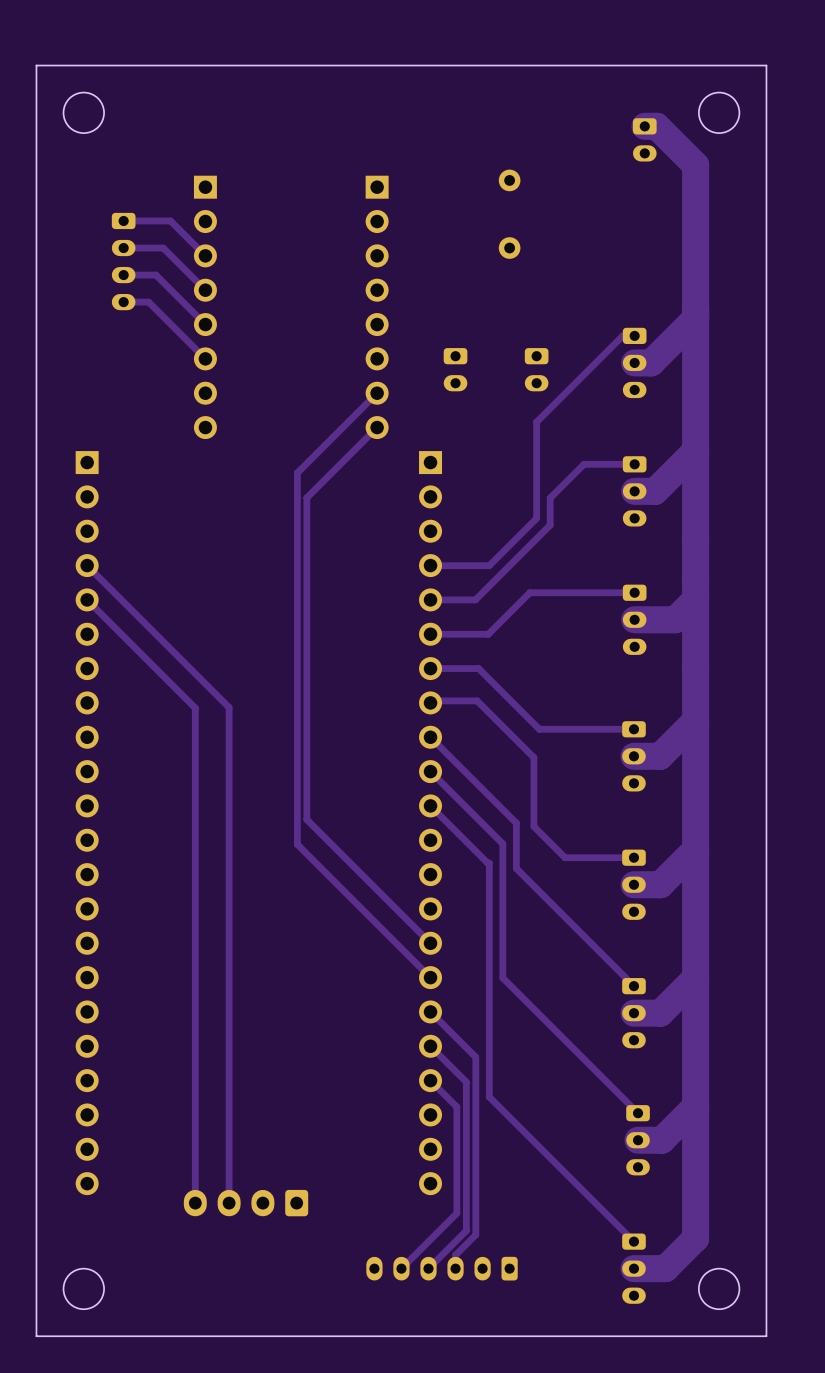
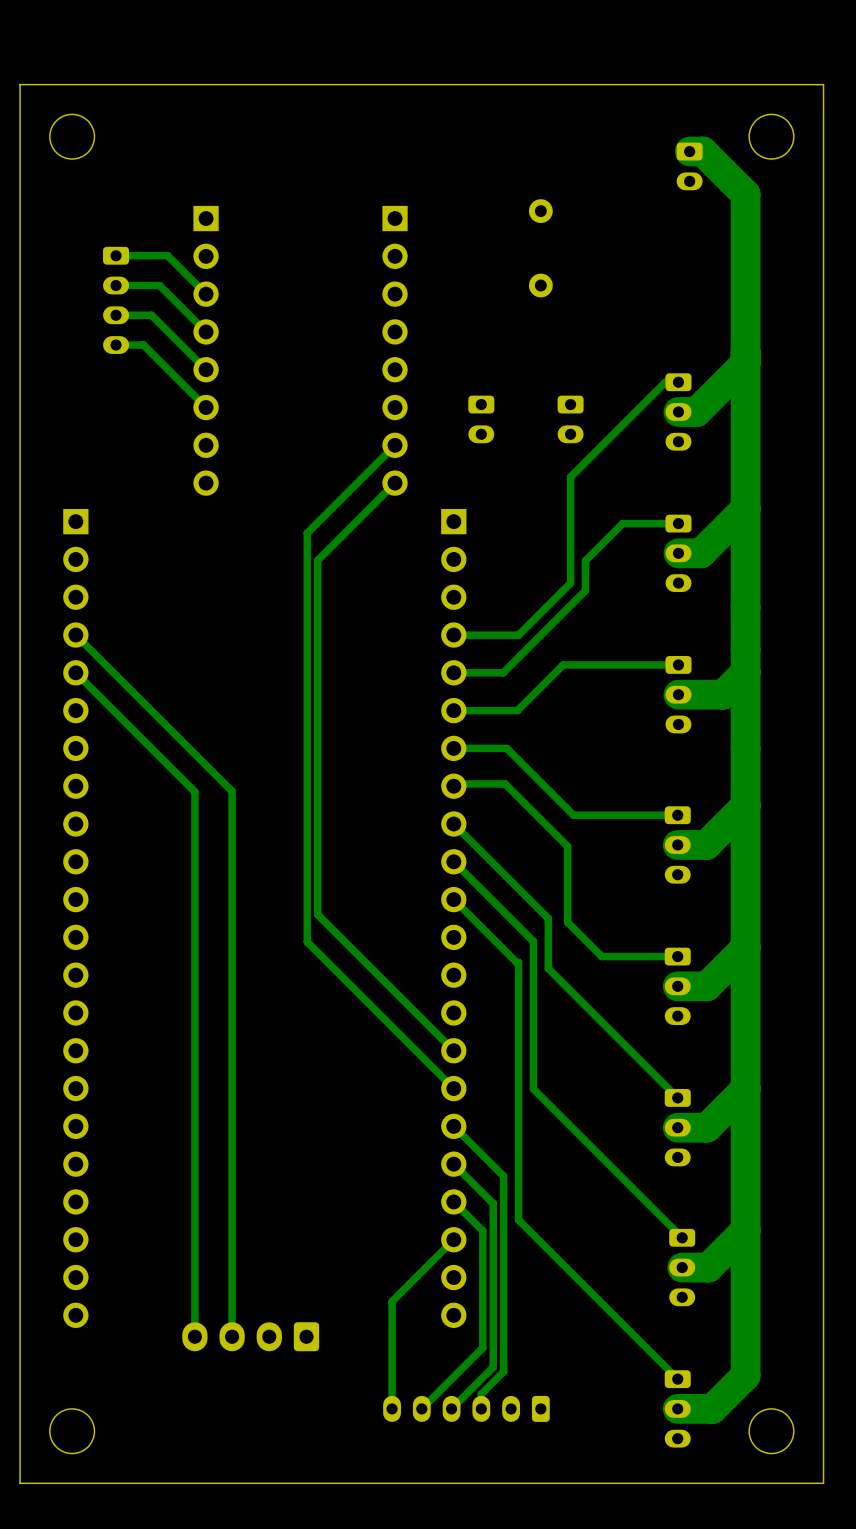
track: none -> (453, 1239) (392, 1301) (392, 1408)

